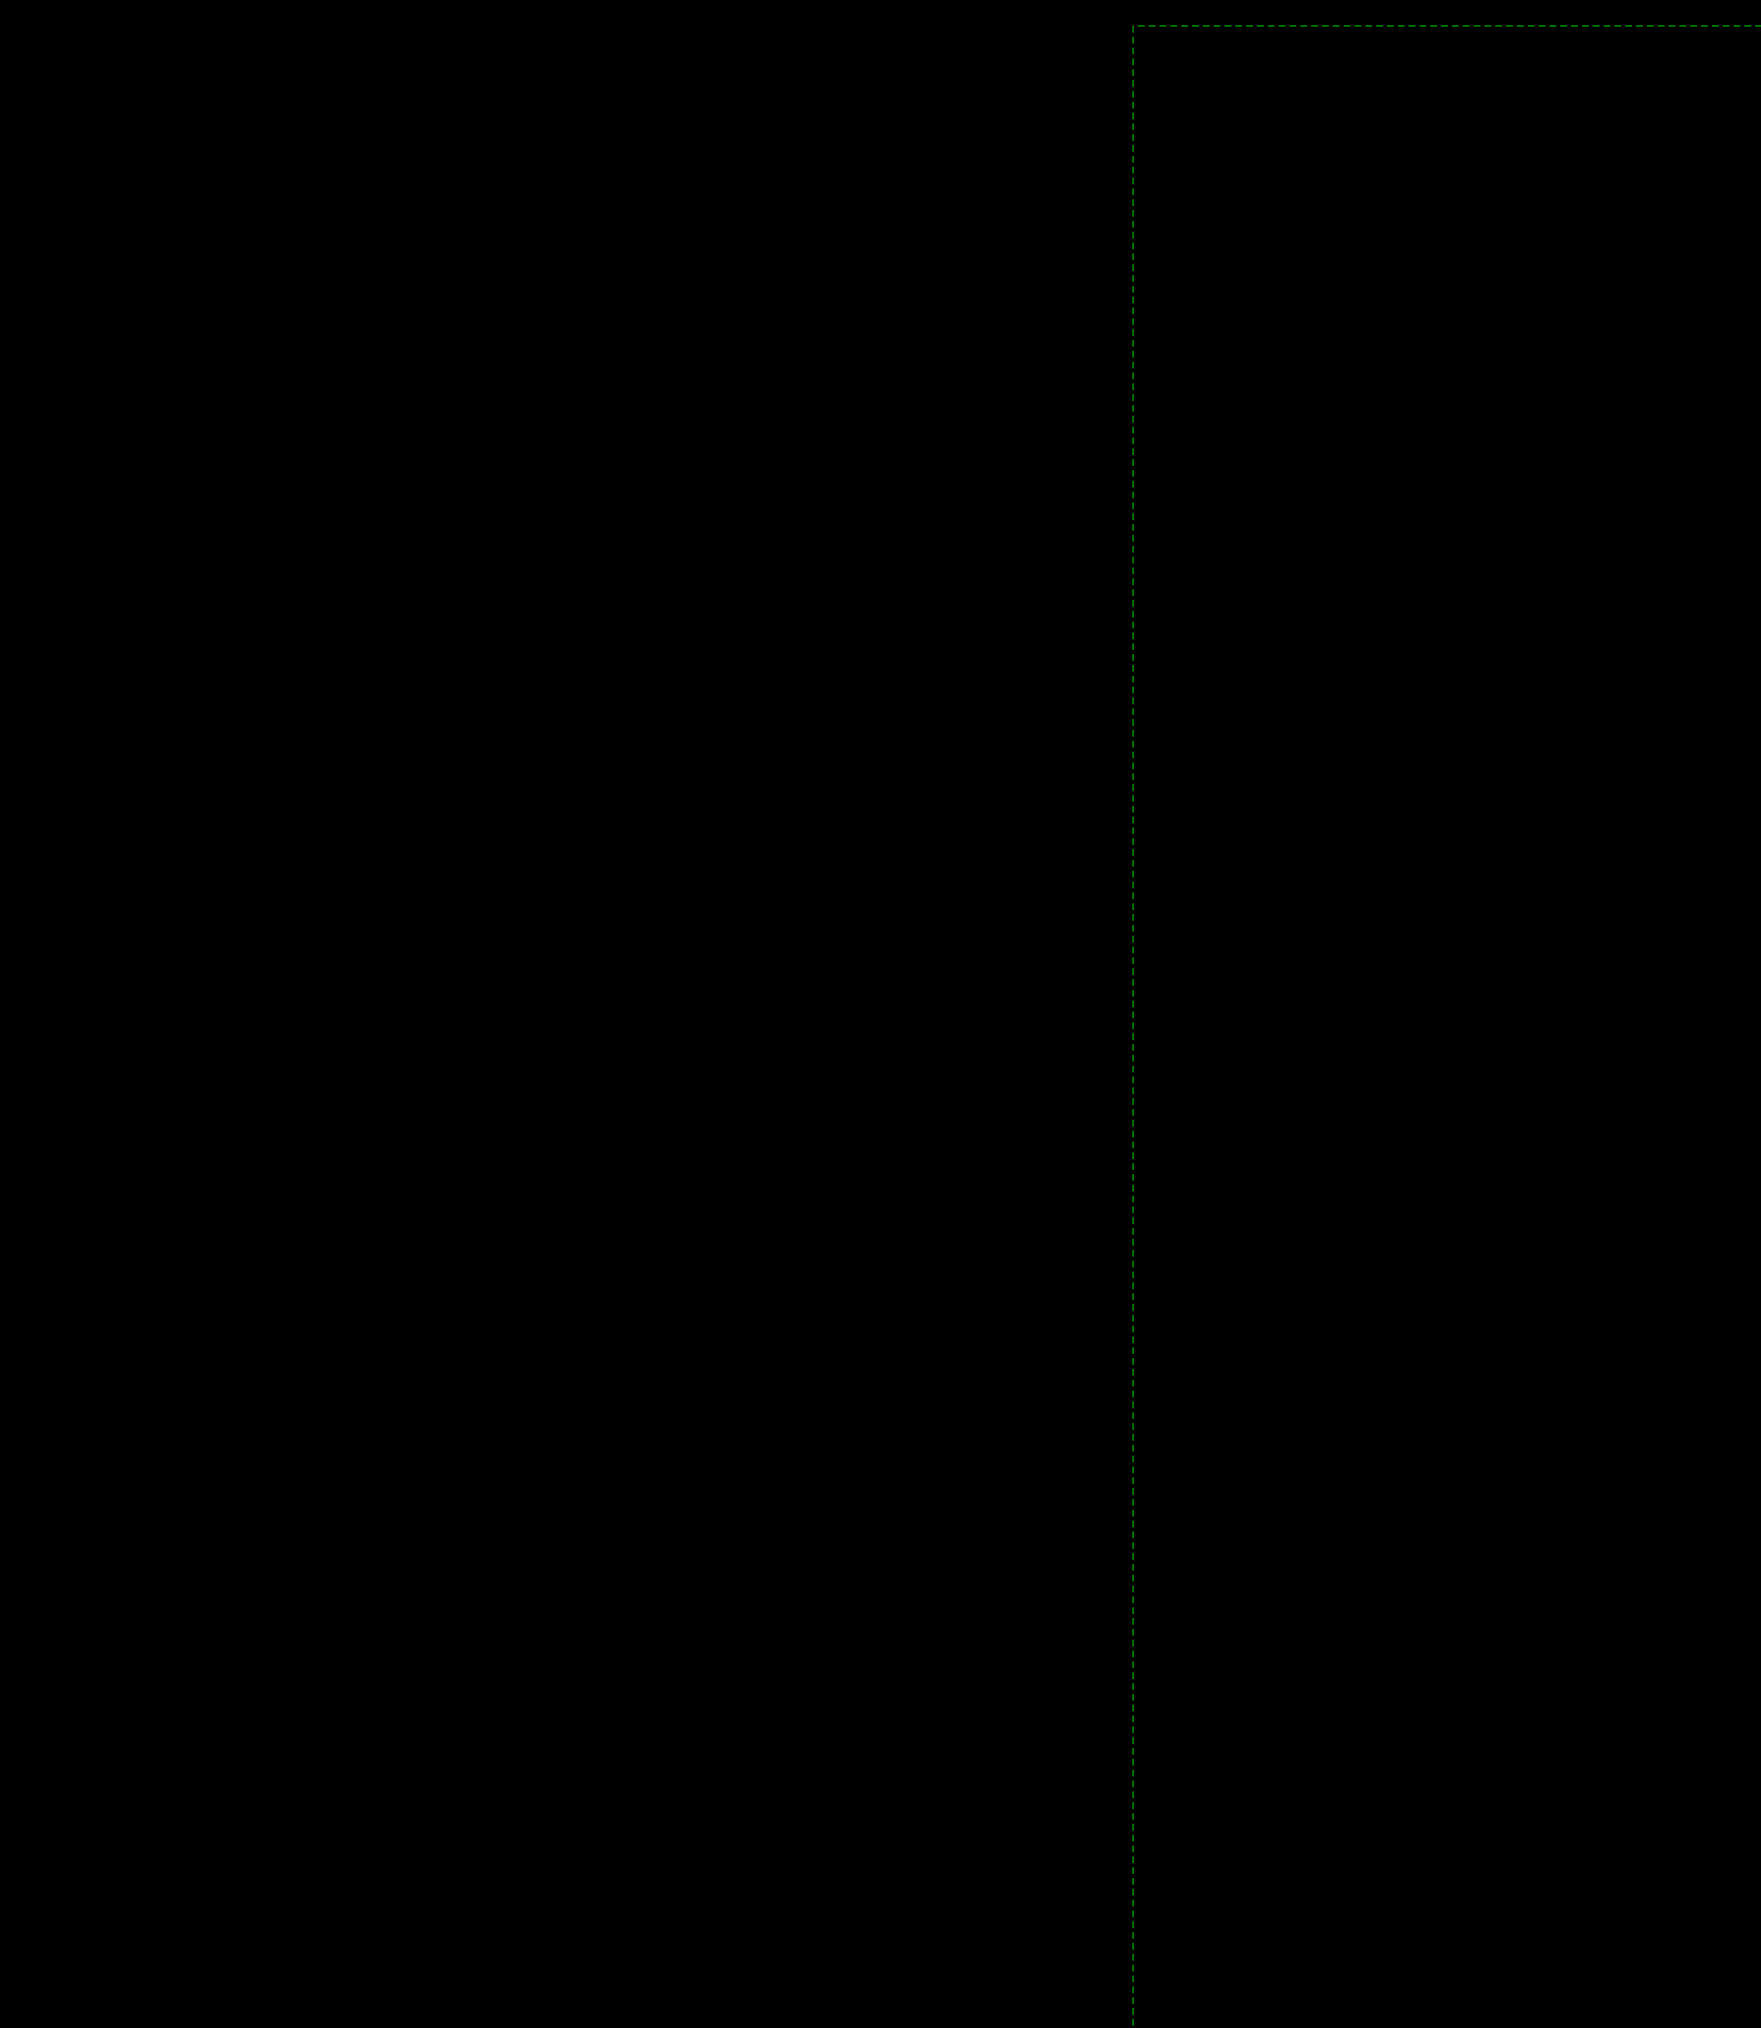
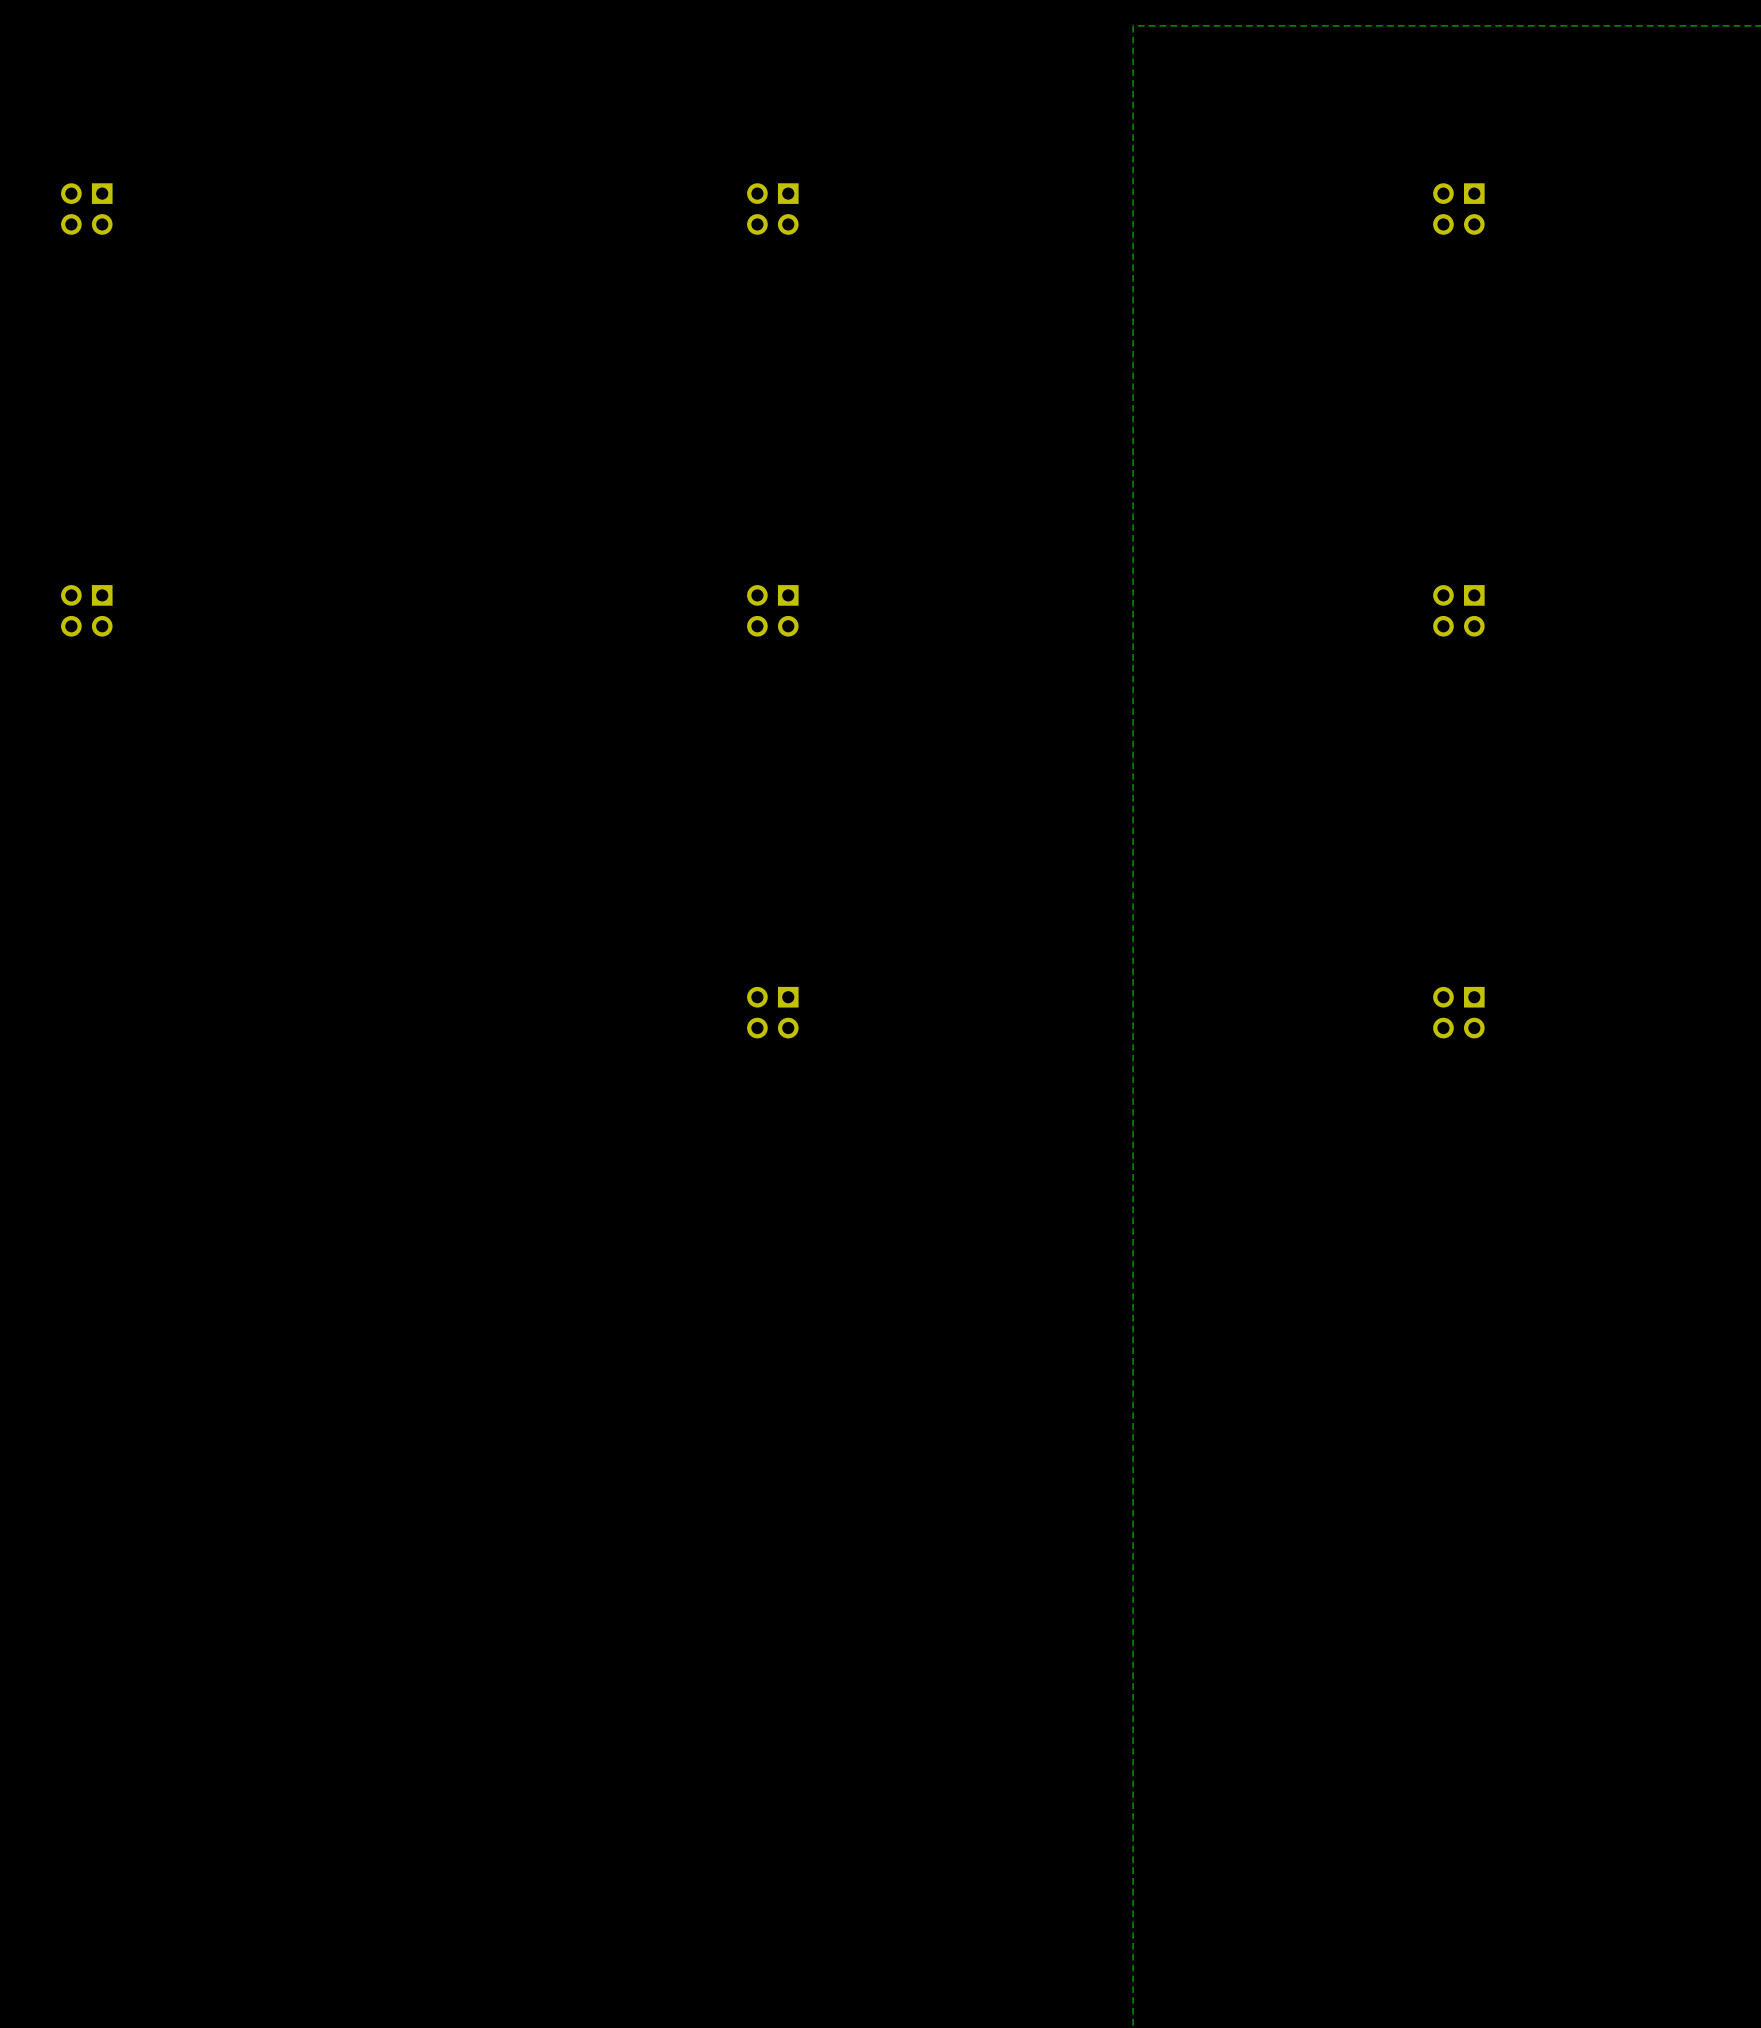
part: none -> (86, 209)
part: none -> (772, 209)
part: none -> (1458, 209)
part: none -> (86, 610)
part: none -> (772, 610)
part: none -> (1458, 610)
part: none -> (772, 1012)
part: none -> (1458, 1012)

